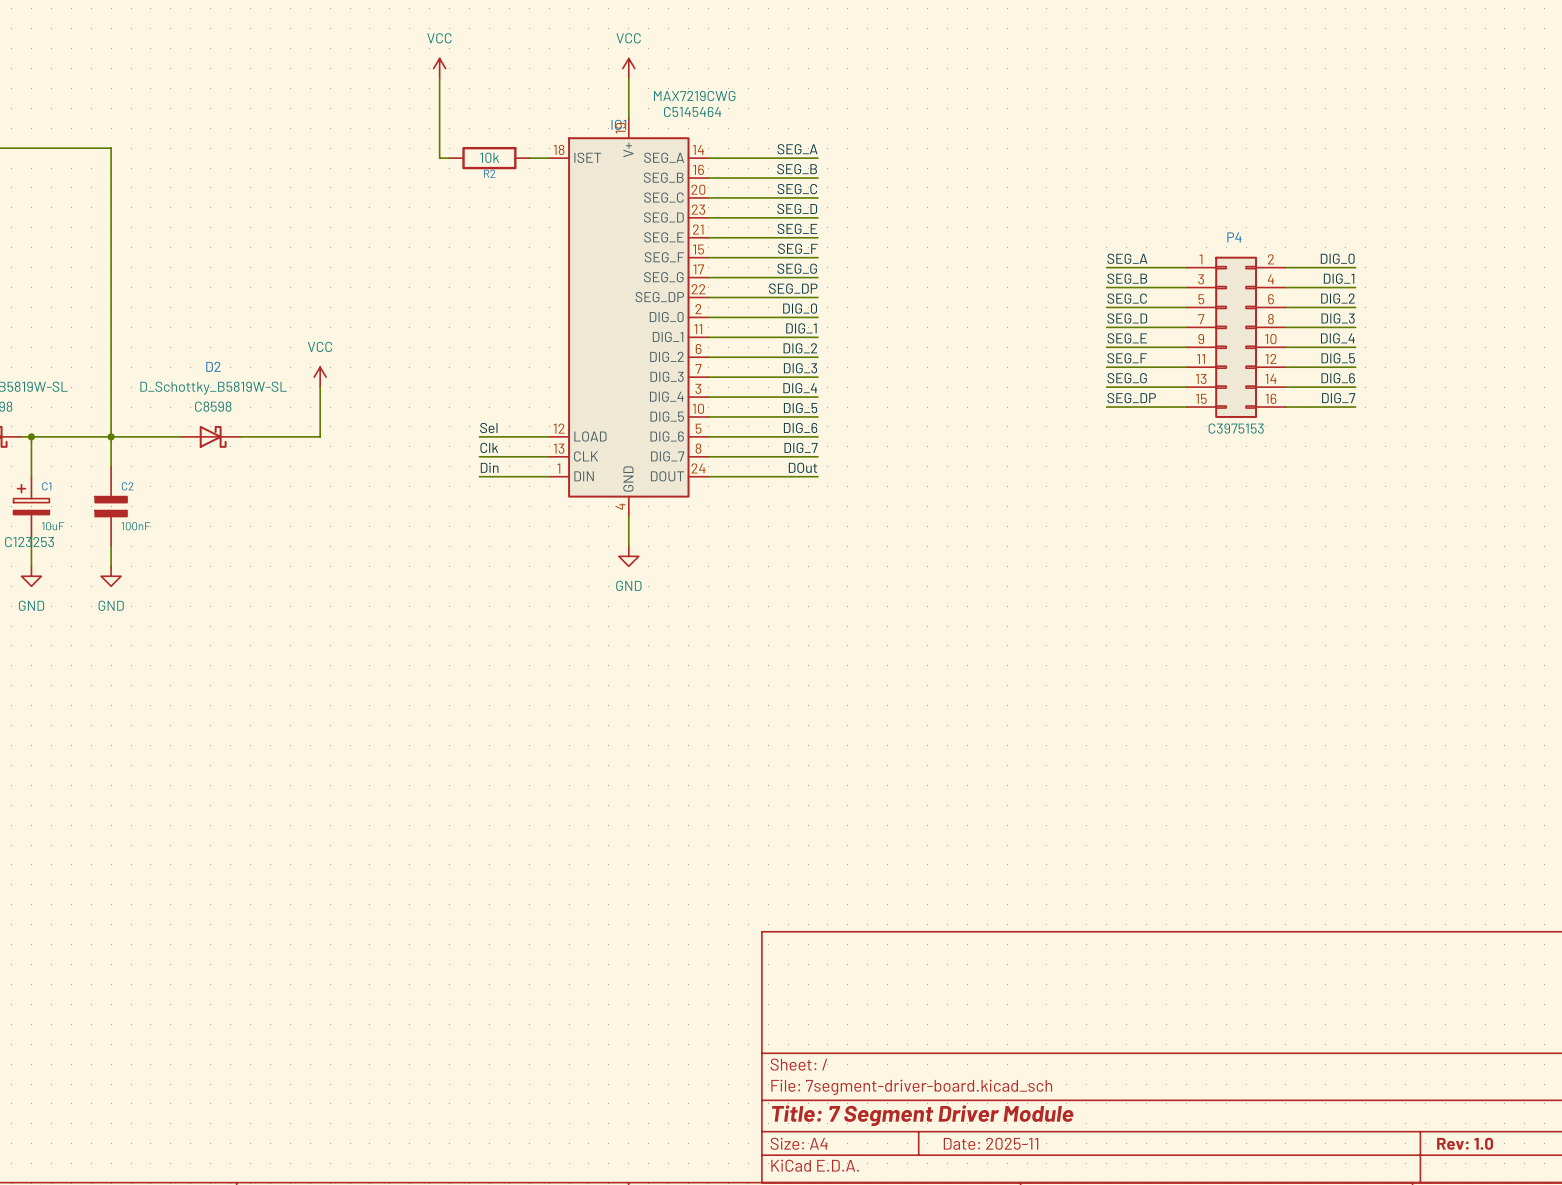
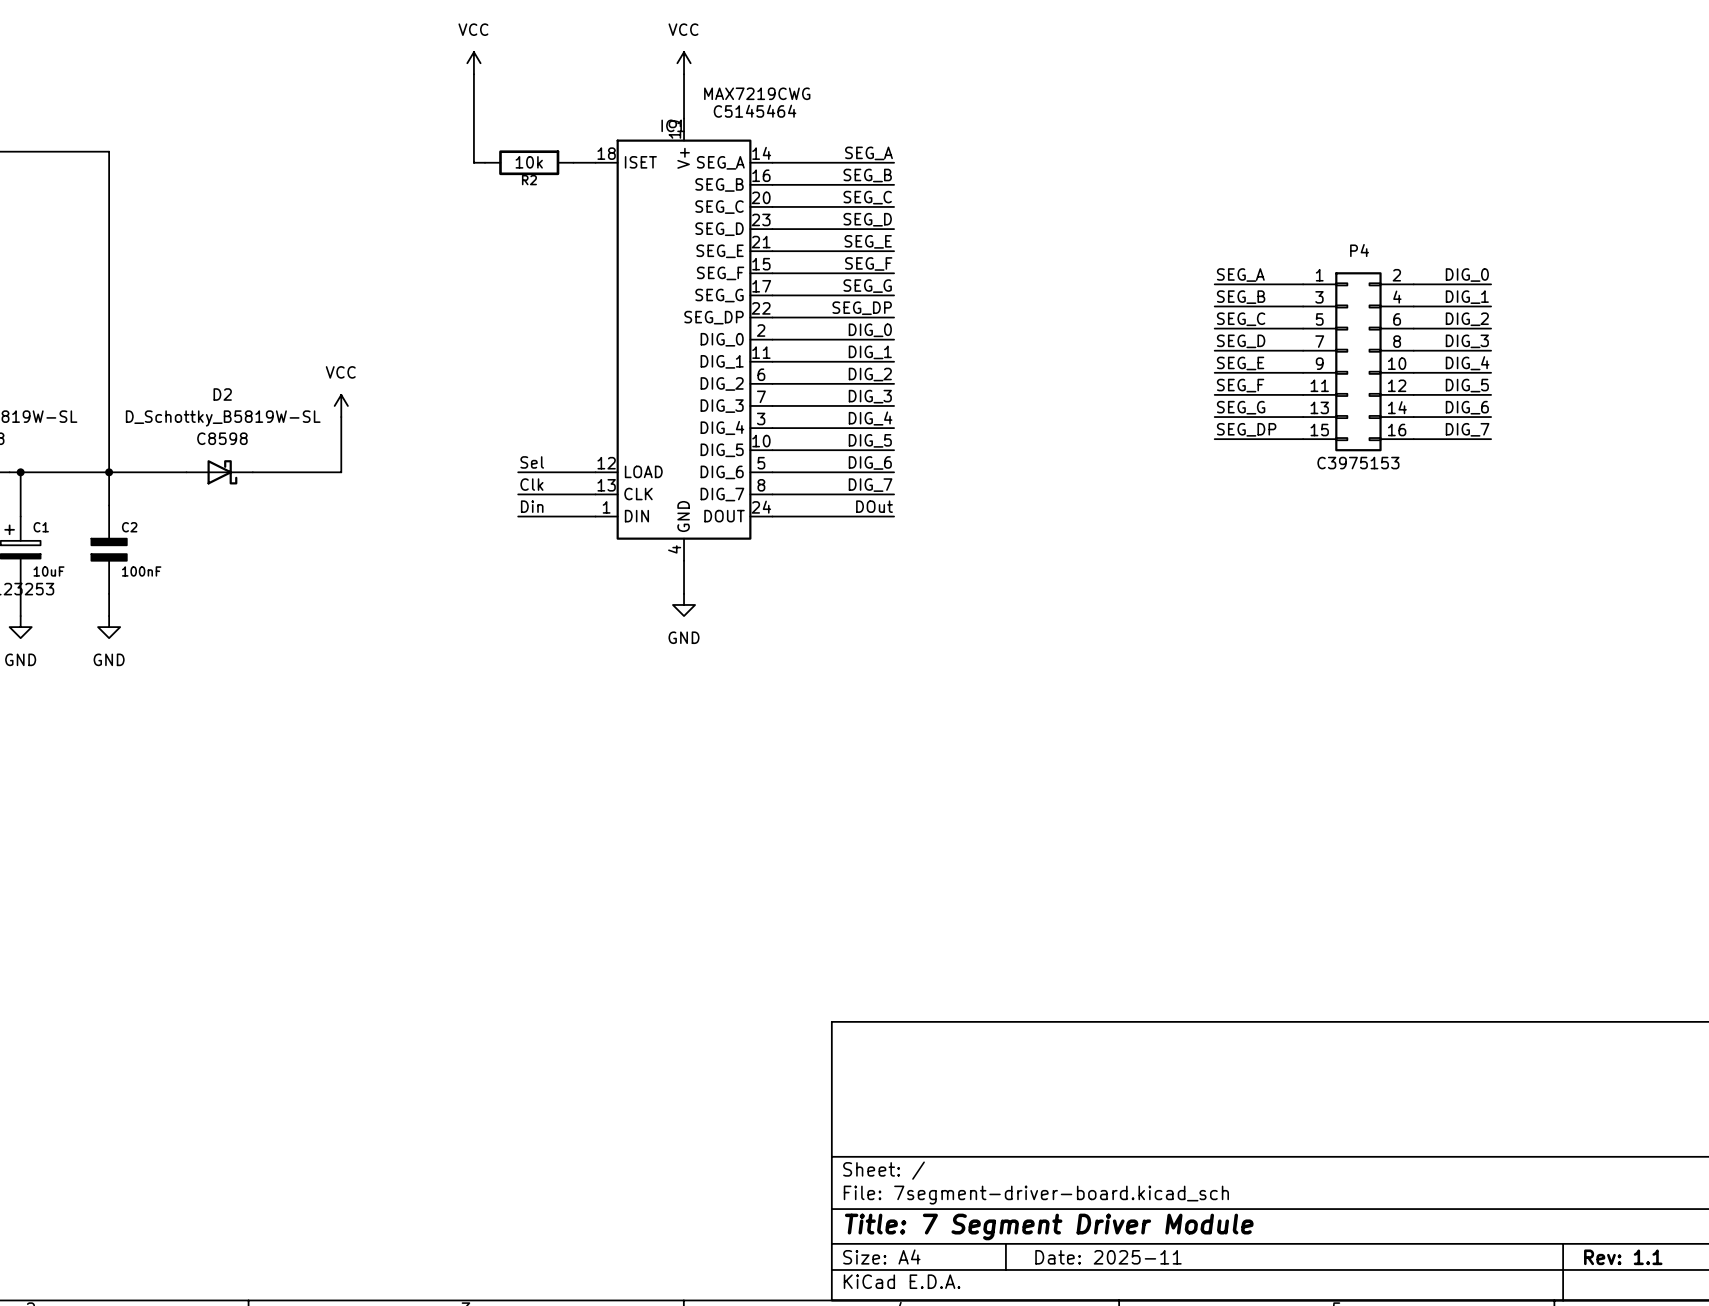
title block: Rev: 1.0 (1465, 1143) -> Rev: 1.1 (1623, 1257)

